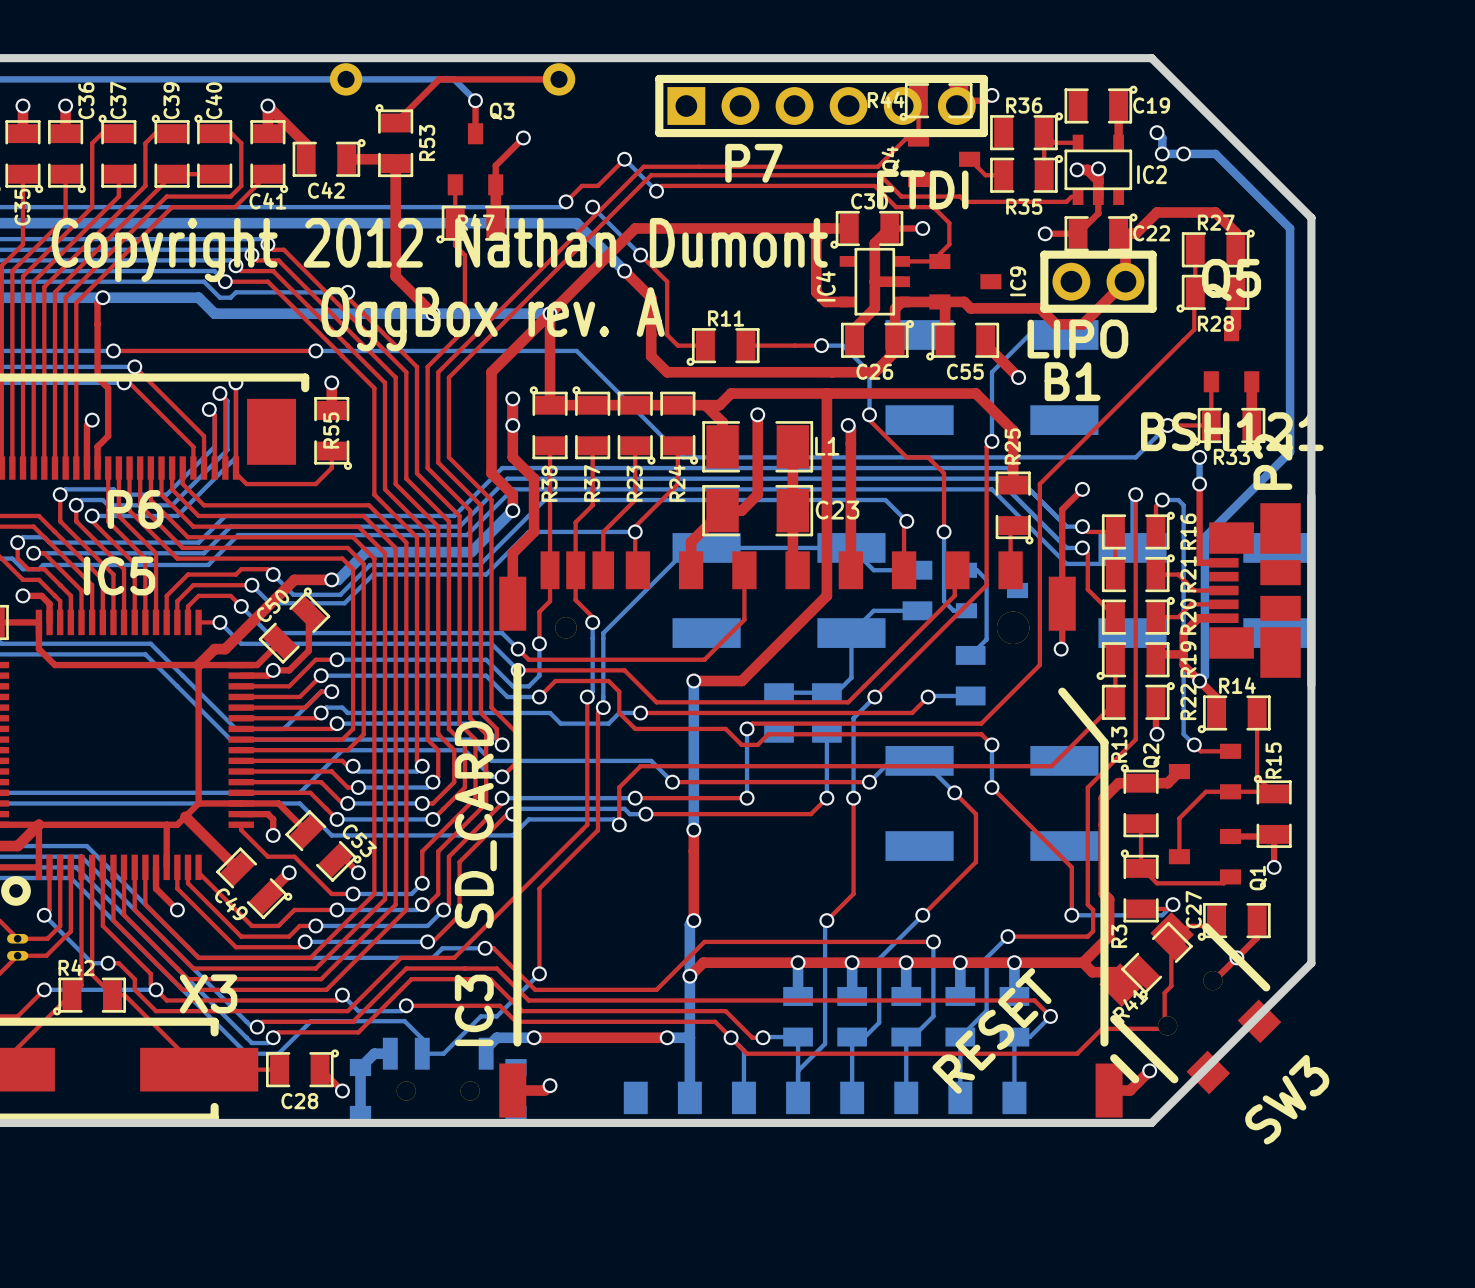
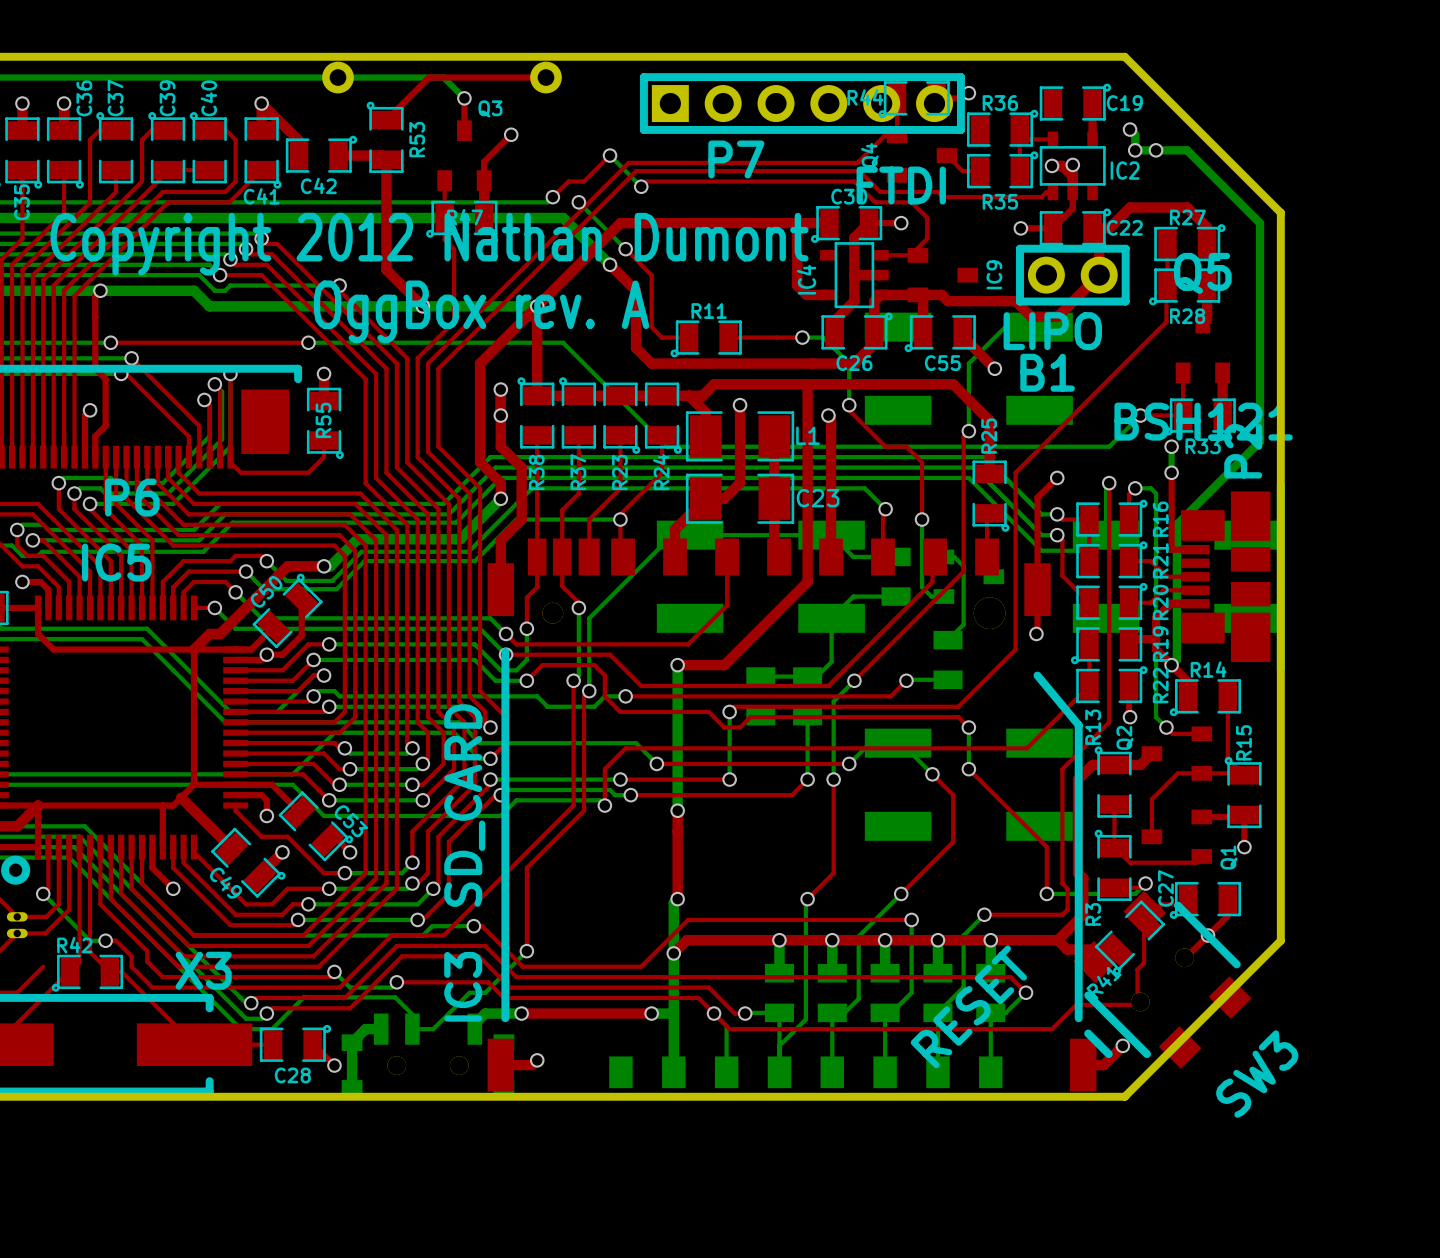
bottom track: (44, 989) (156, 989) -> none
via: (44, 989) -> none
via: (156, 989) -> none

